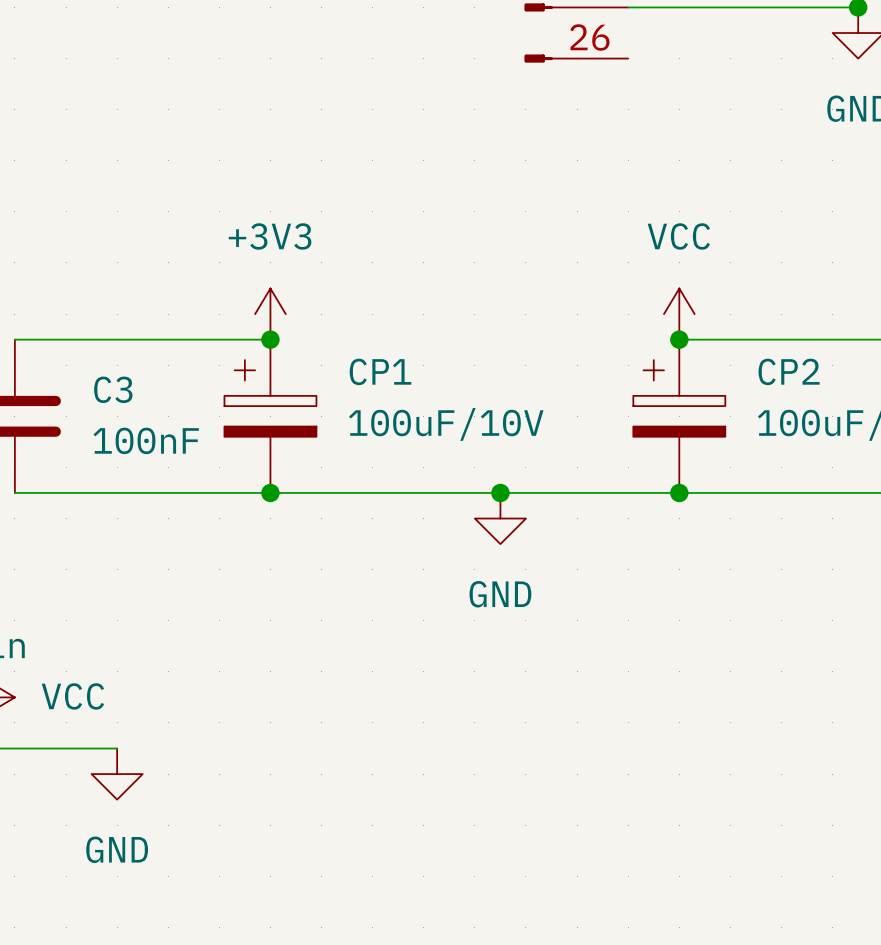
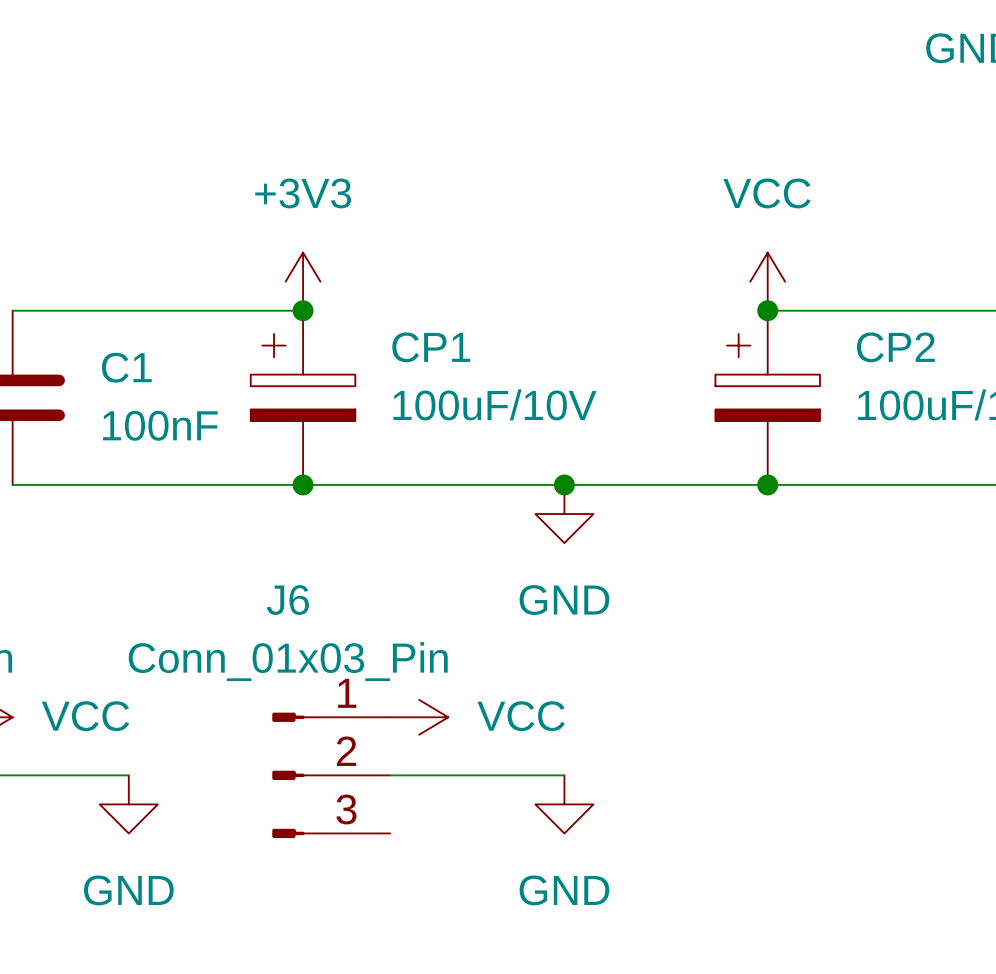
C3 name: C3 (113, 389) -> C1 (126, 367)
power symbol: none -> VCC (419, 717)
J6: none -> Conn_01x03_Pin (331, 775)
wire: none -> (390, 775) (564, 775)
power symbol: none -> GND (564, 804)

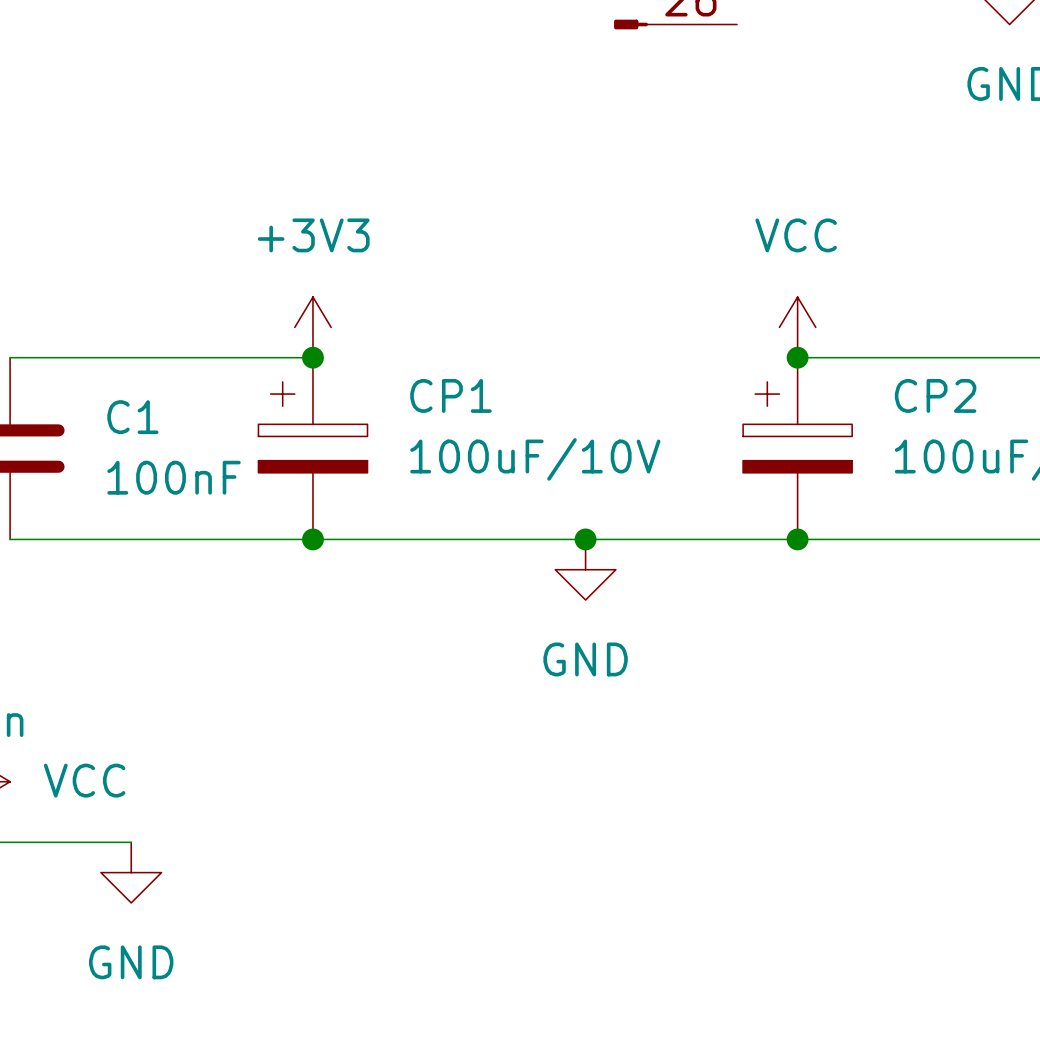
power symbol: VCC (419, 717) -> none
J6: Conn_01x03_Pin (331, 775) -> none
wire: (390, 775) (564, 775) -> none
power symbol: GND (564, 804) -> none

